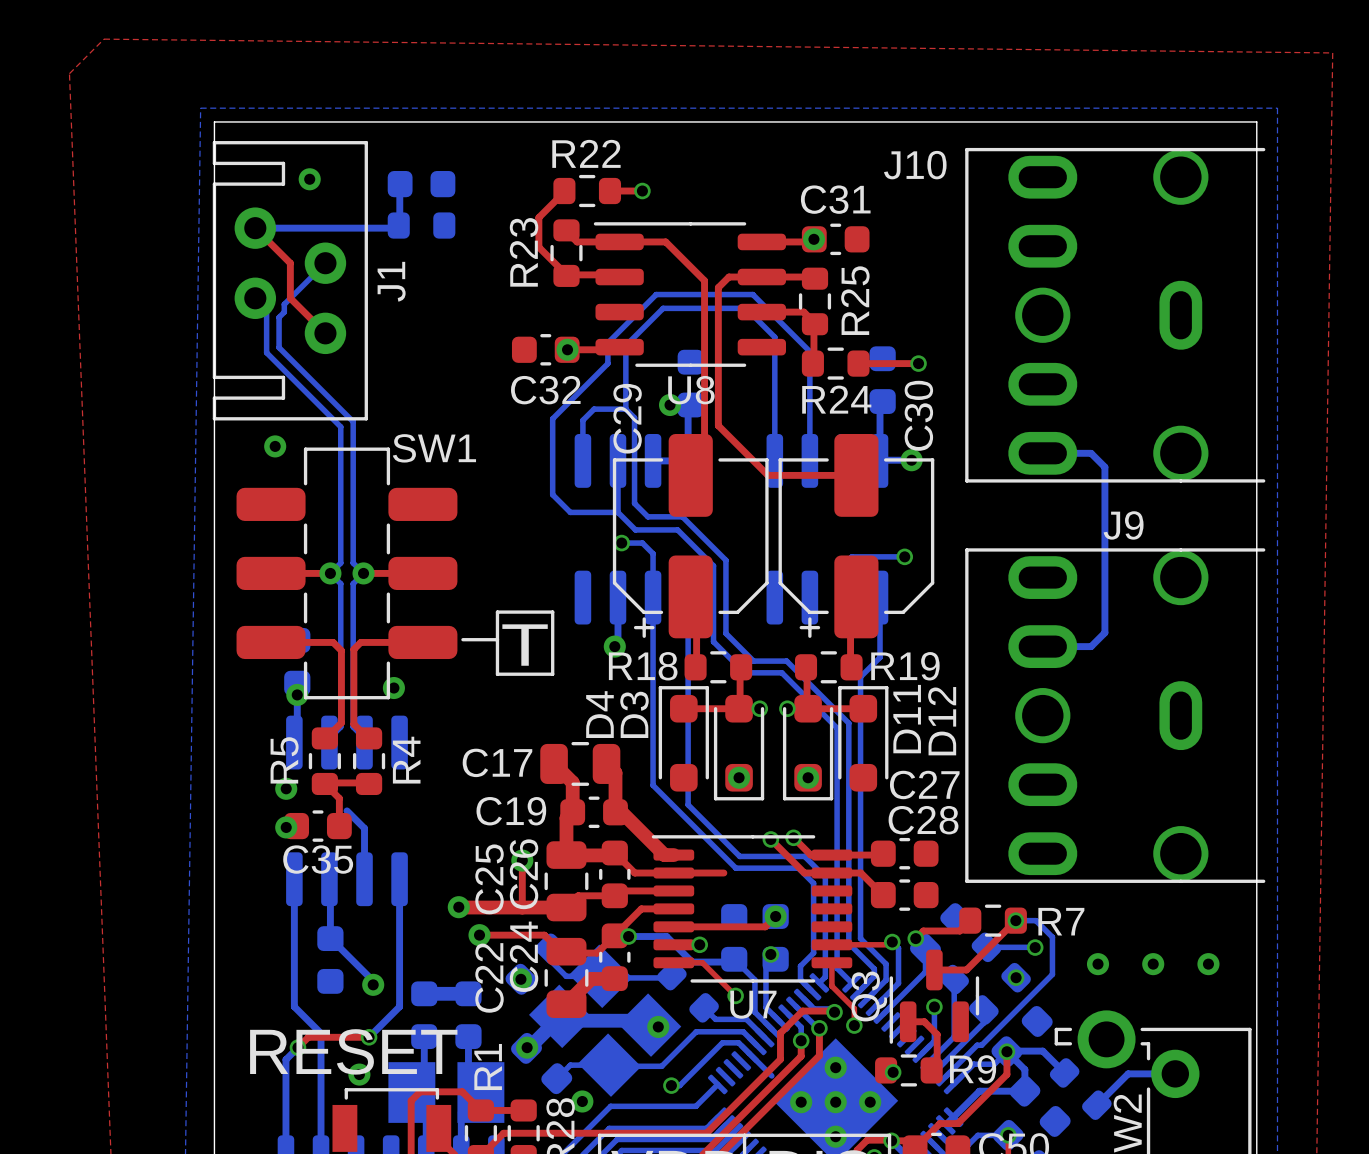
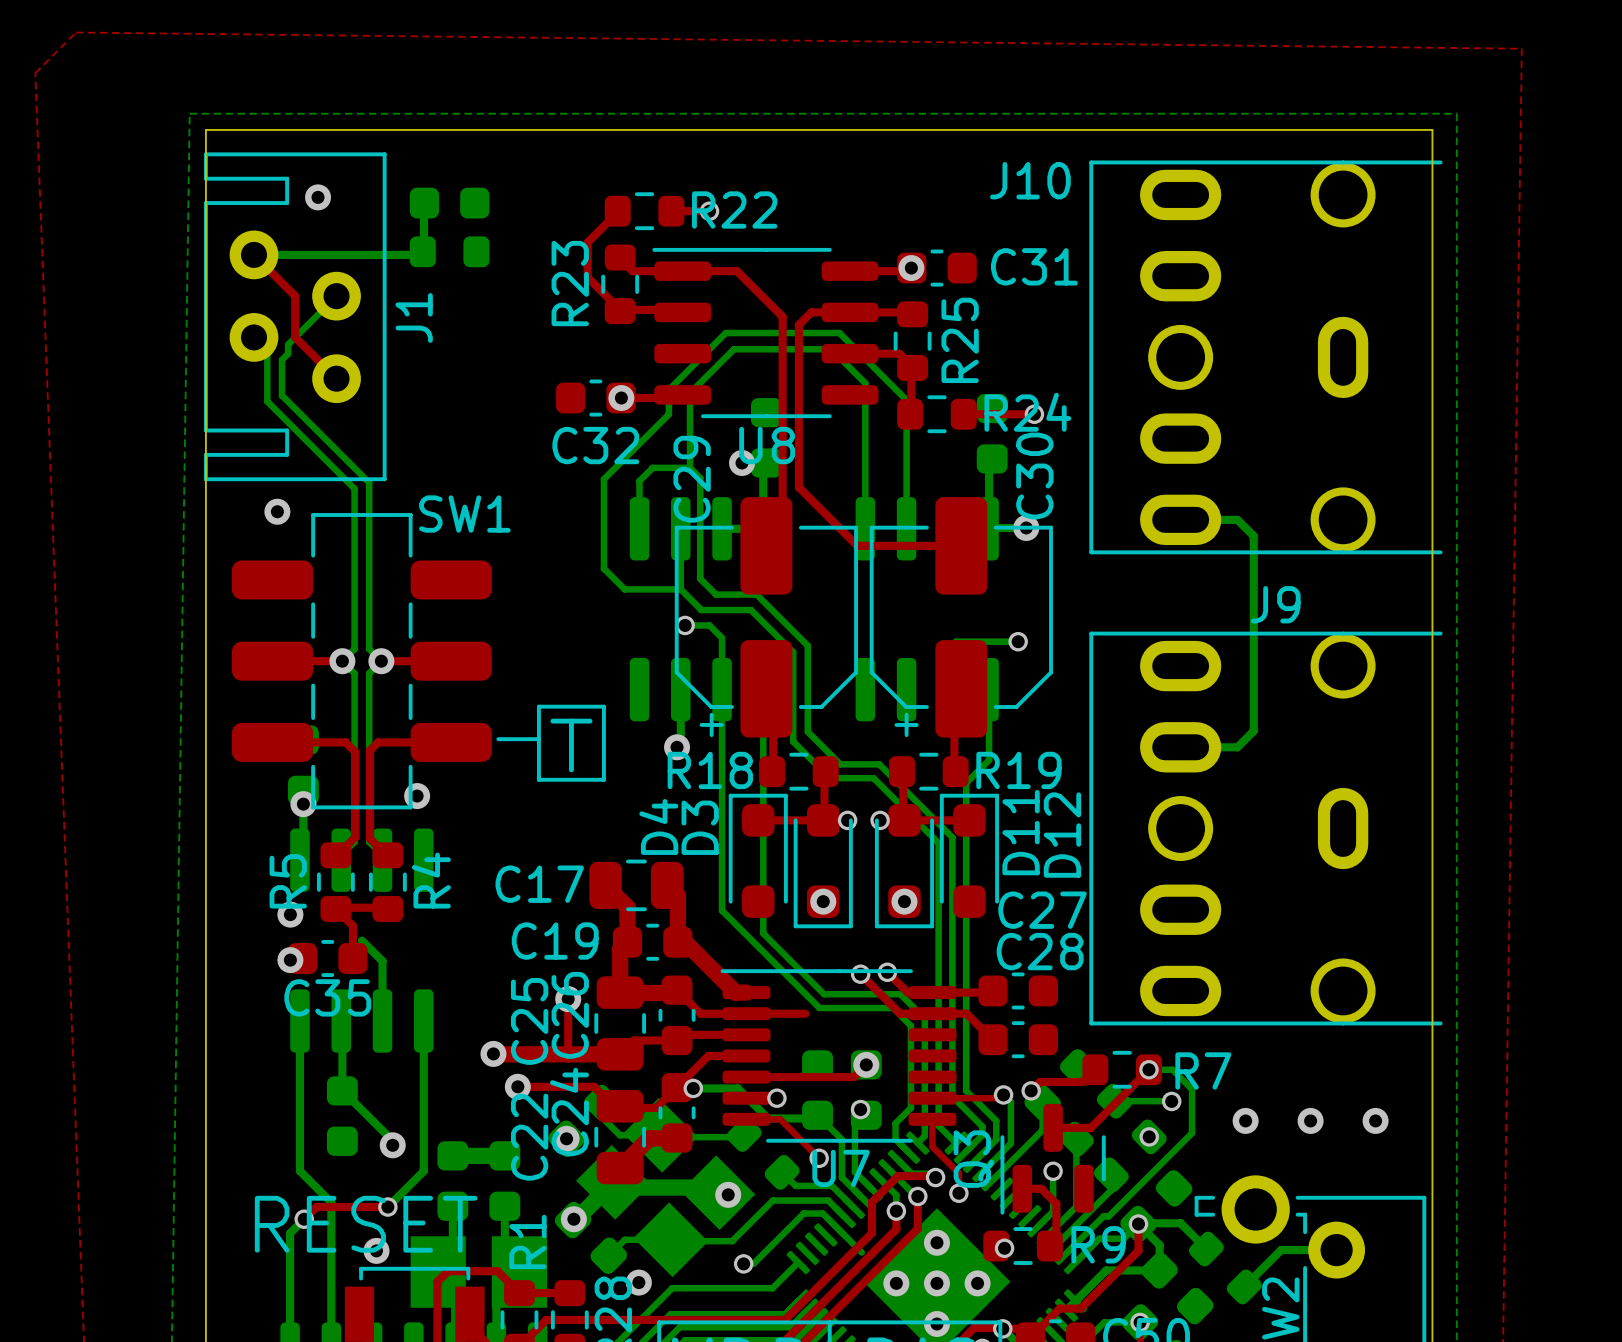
R22 name position: R22 (586, 153) -> R22 (734, 209)
C31 name position: C31 (835, 199) -> C31 (1034, 266)
R24 name position: R24 (836, 399) -> R24 (1027, 412)

